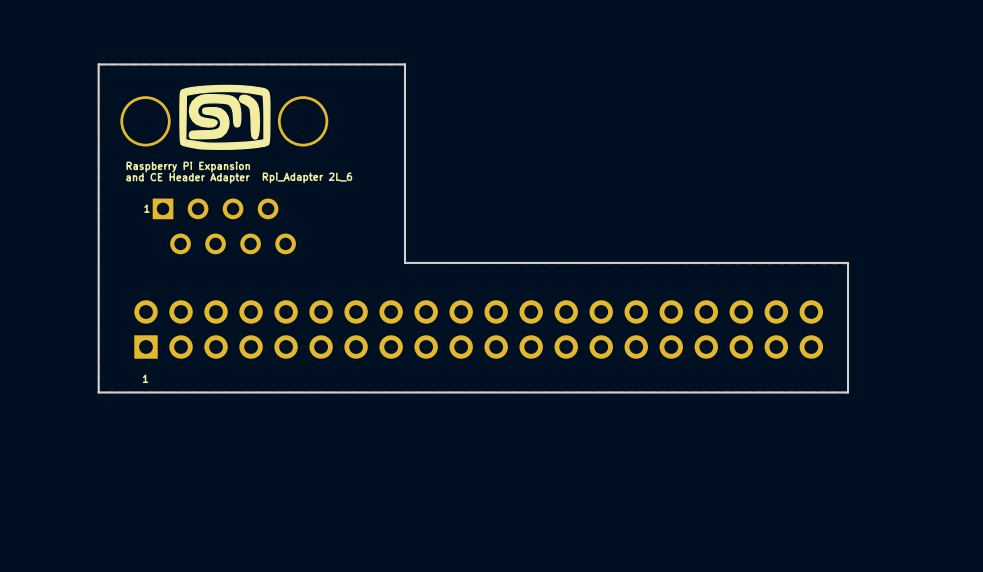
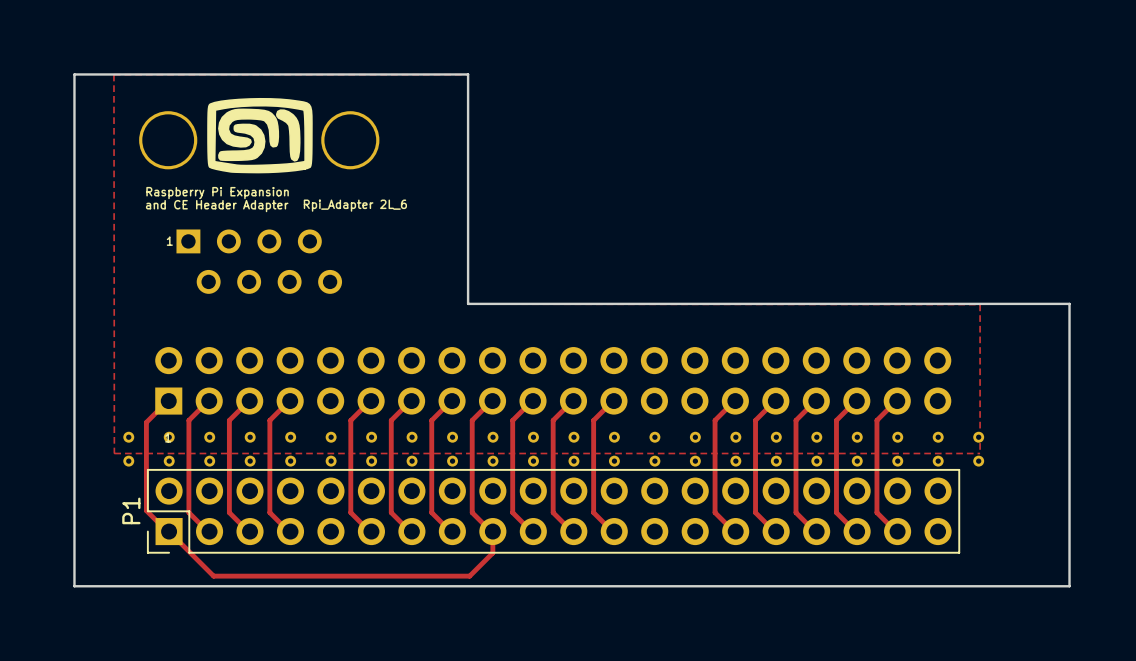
board edge: (98, 64) (98, 392) (848, 392) (848, 262) -> (114, 74) (74, 74) (74, 586) (1069, 586) (1069, 303) (980, 303)
track: none -> (167, 401) (146, 422) (146, 510) (169, 533)
track: none -> (207, 401) (188, 420) (188, 512) (209, 533)
track: none -> (248, 401) (229, 420) (229, 512) (250, 533)
track: none -> (288, 401) (269, 420) (269, 512) (290, 533)
track: none -> (369, 401) (350, 420) (350, 512) (371, 533)
track: none -> (410, 401) (391, 420) (391, 512) (412, 533)
track: none -> (450, 401) (431, 420) (431, 512) (452, 533)
track: none -> (490, 401) (472, 420) (472, 512) (493, 533)
track: none -> (531, 401) (512, 420) (512, 512) (533, 533)
track: none -> (571, 401) (553, 420) (553, 512) (573, 533)
track: none -> (612, 401) (593, 420) (593, 512) (614, 533)
track: none -> (733, 401) (715, 420) (715, 512) (735, 533)
track: none -> (774, 401) (755, 420) (755, 512) (776, 533)
track: none -> (814, 401) (796, 420) (796, 512) (816, 533)
track: none -> (855, 401) (836, 420) (836, 512) (857, 533)
track: none -> (895, 401) (876, 420) (876, 512) (897, 533)
part: none -> (128, 437)
part: none -> (169, 437)
part: none -> (209, 437)
part: none -> (250, 437)
part: none -> (290, 437)
part: none -> (331, 437)
part: none -> (371, 437)
part: none -> (412, 437)
part: none -> (452, 437)
part: none -> (493, 437)
part: none -> (533, 437)
part: none -> (573, 437)
part: none -> (614, 437)
part: none -> (654, 437)
part: none -> (695, 437)
part: none -> (735, 437)
part: none -> (776, 437)
part: none -> (816, 437)
part: none -> (857, 437)
part: none -> (897, 437)
part: none -> (938, 437)
part: none -> (978, 437)
part: none -> (128, 461)
part: none -> (169, 461)
part: none -> (209, 461)
part: none -> (250, 461)
part: none -> (290, 461)
part: none -> (331, 461)
part: none -> (371, 461)
part: none -> (412, 461)
part: none -> (452, 461)
part: none -> (493, 461)
part: none -> (533, 461)
part: none -> (573, 461)
part: none -> (614, 461)
part: none -> (654, 461)
part: none -> (695, 461)
part: none -> (735, 461)
part: none -> (776, 461)
part: none -> (816, 461)
part: none -> (857, 461)
part: none -> (897, 461)
part: none -> (938, 461)
part: none -> (978, 461)
P1: none -> (553, 511)
track: none -> (169, 531) (213, 576) (469, 576) (492, 552) (492, 531)

